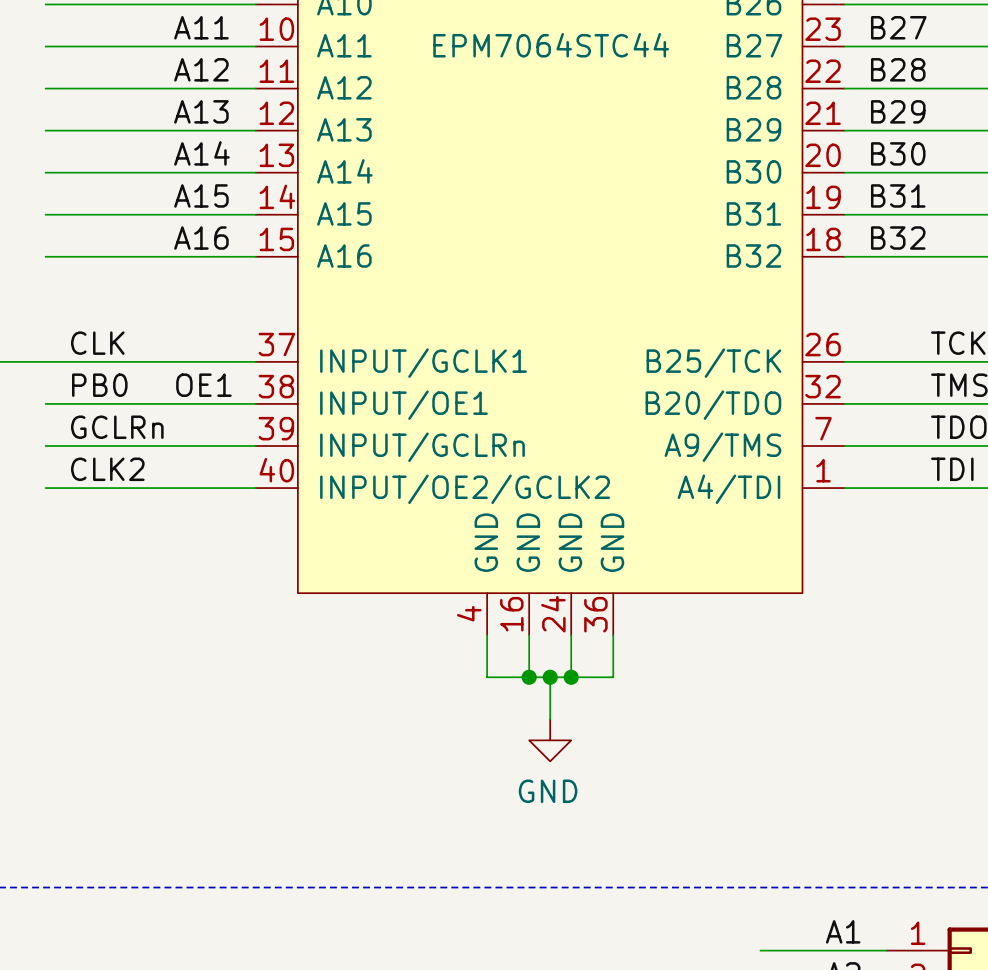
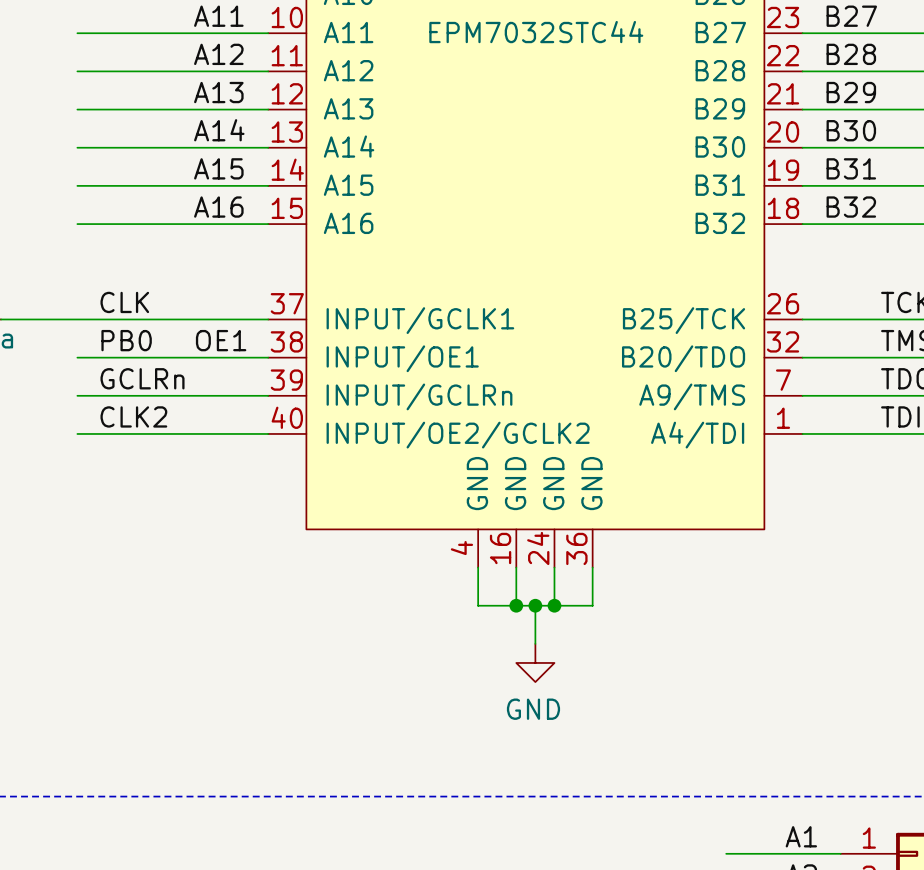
part value: EPM7064STC44 (551, 45) -> EPM7032STC44 (536, 32)

